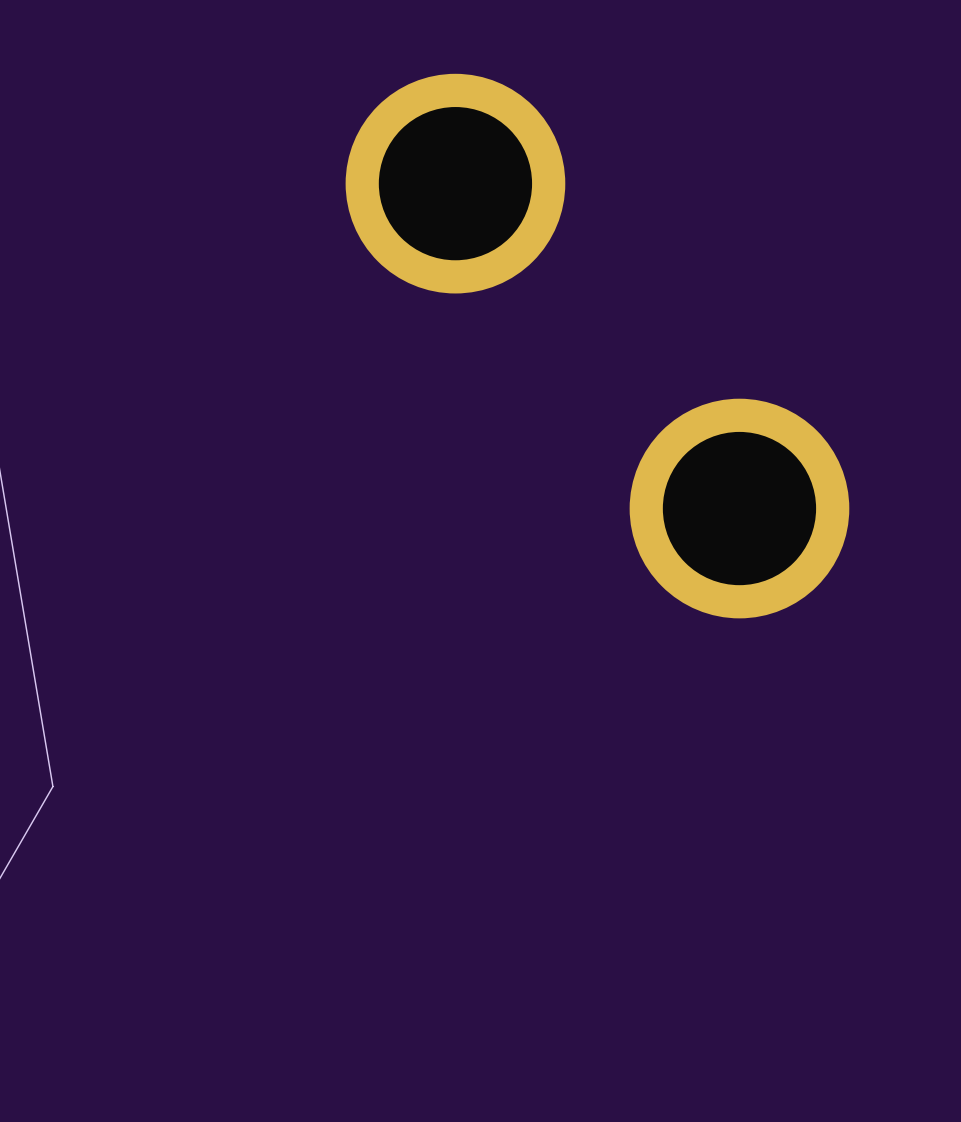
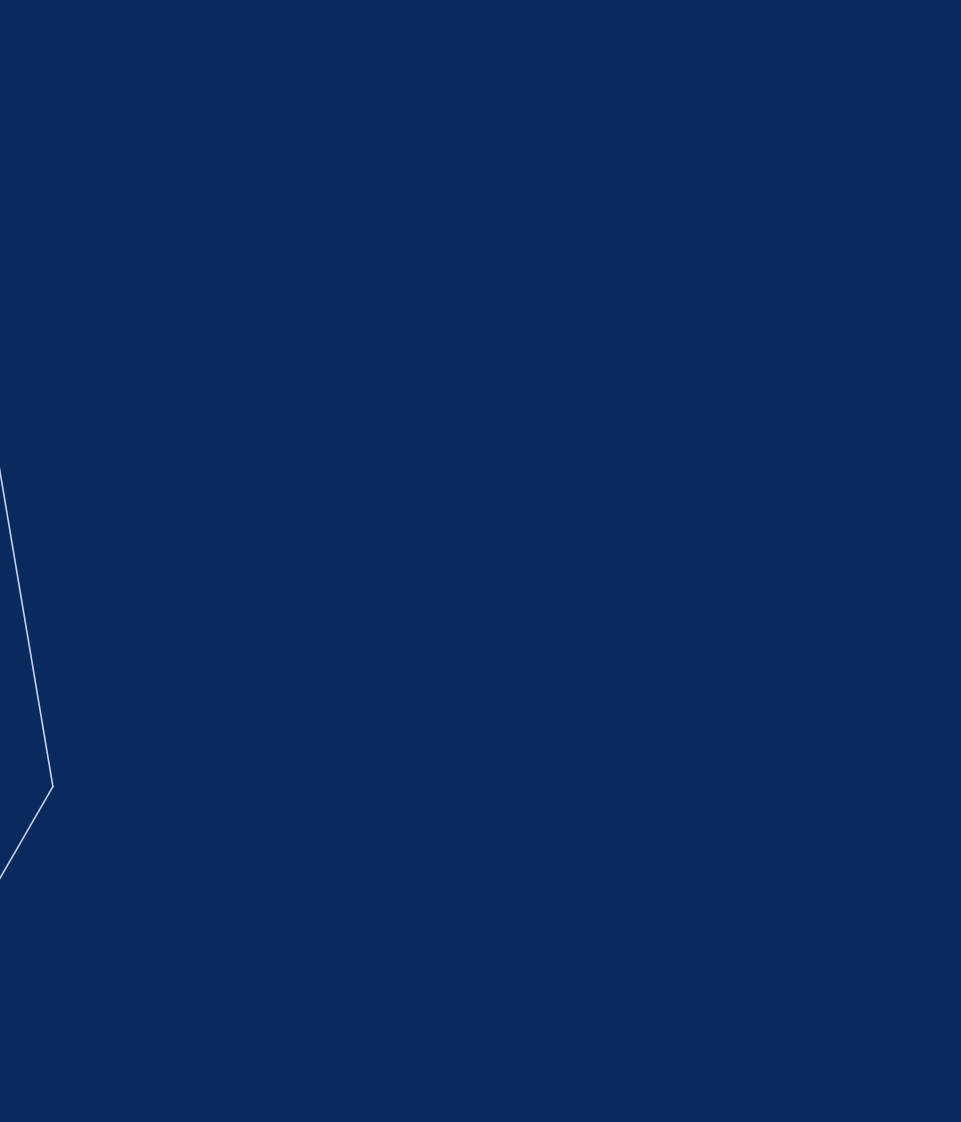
part: (455, 183) -> none
part: (739, 508) -> none

